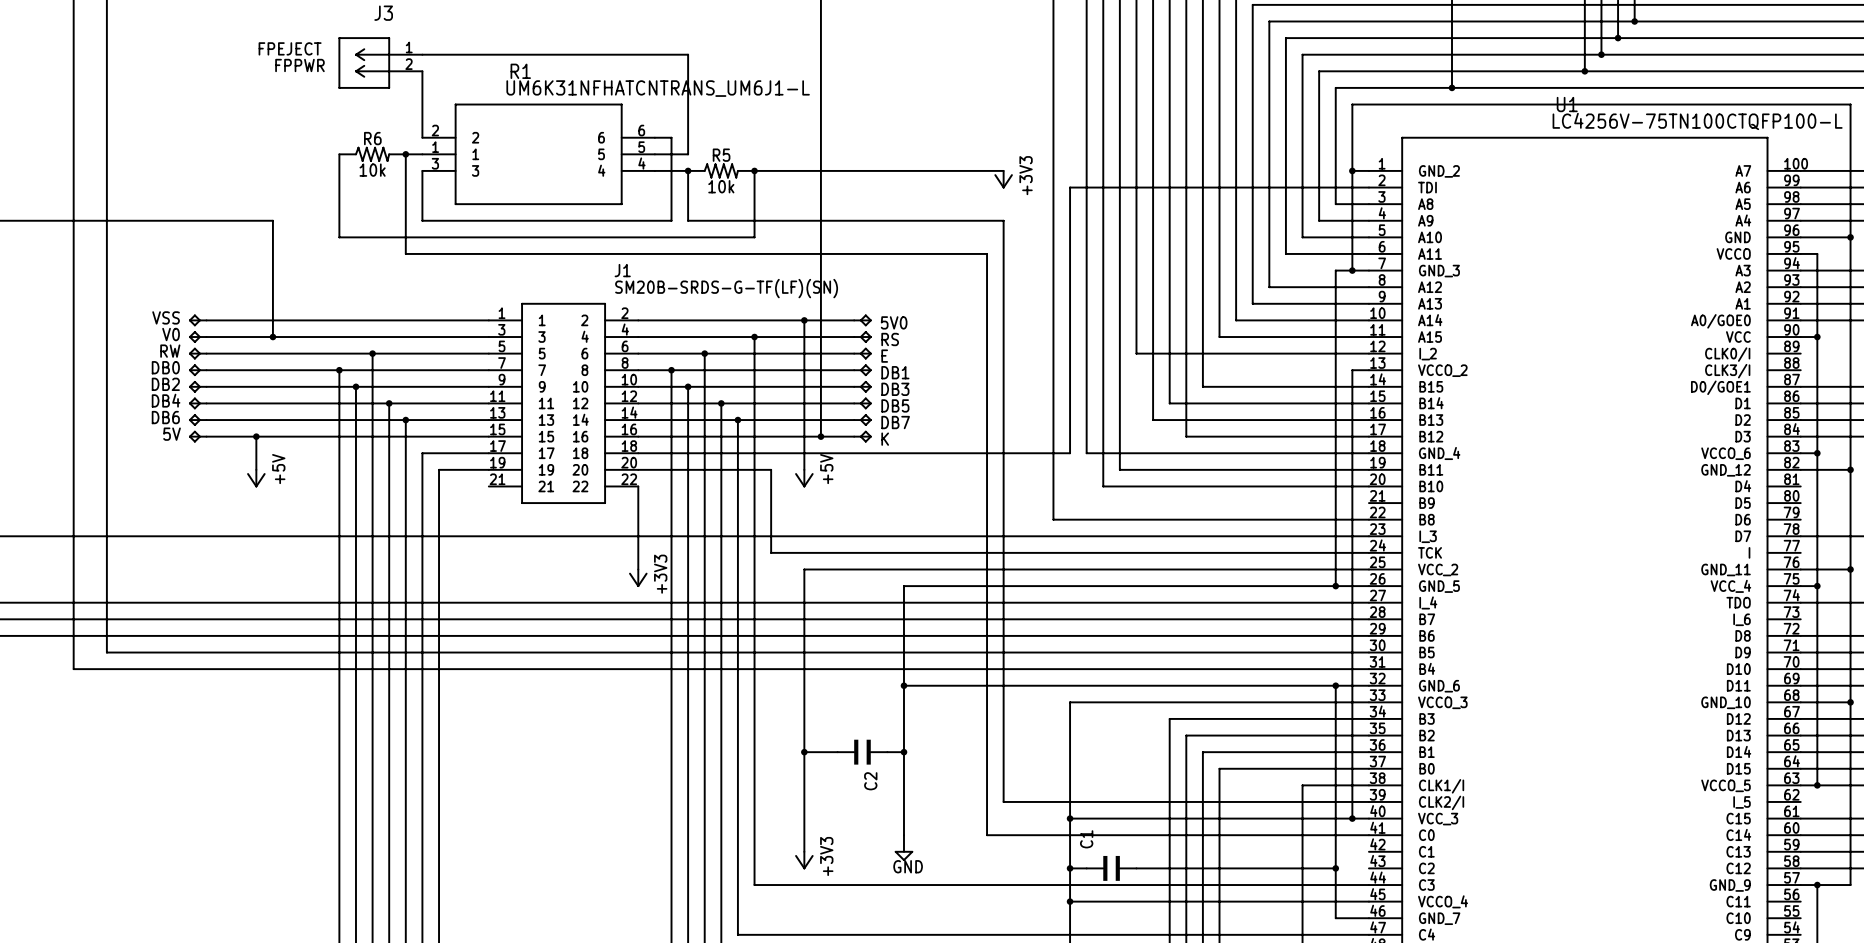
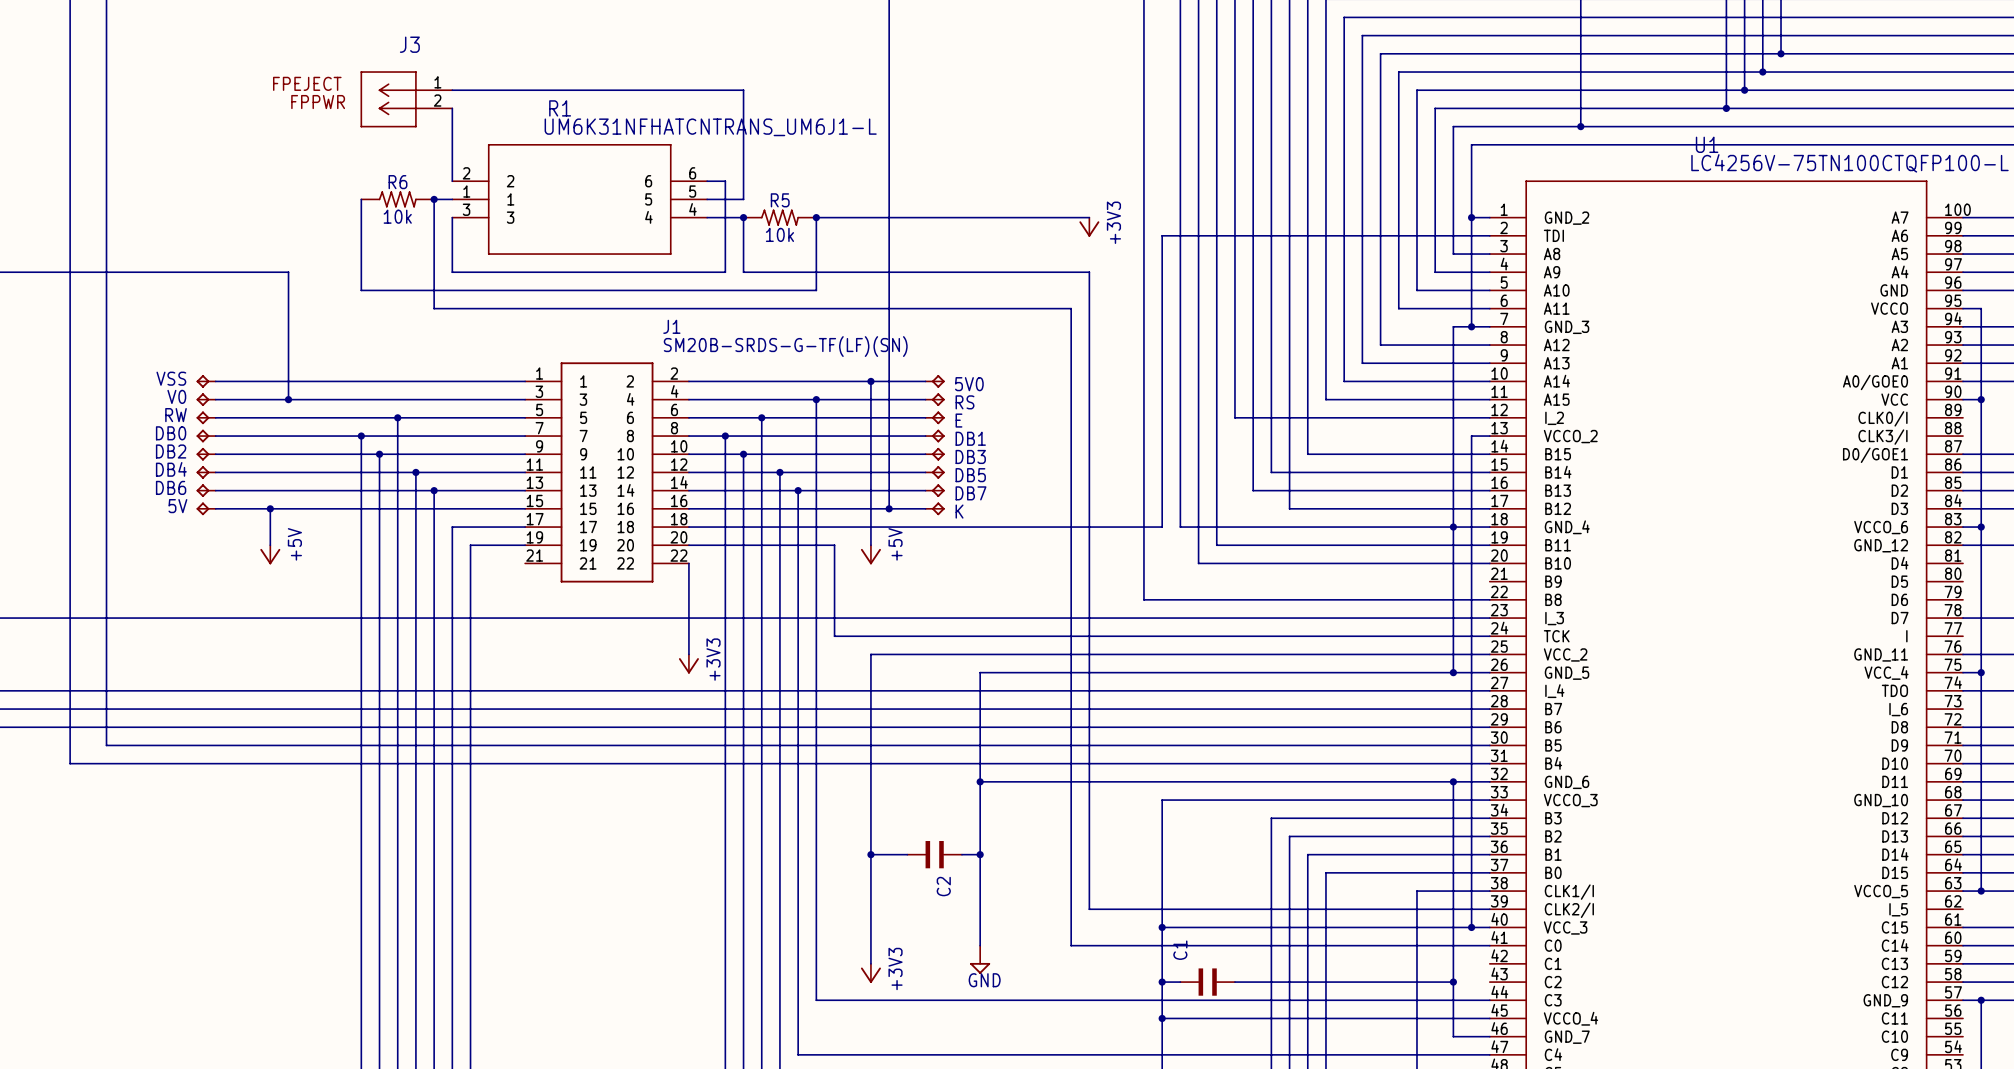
junction: none -> (1453, 527)

